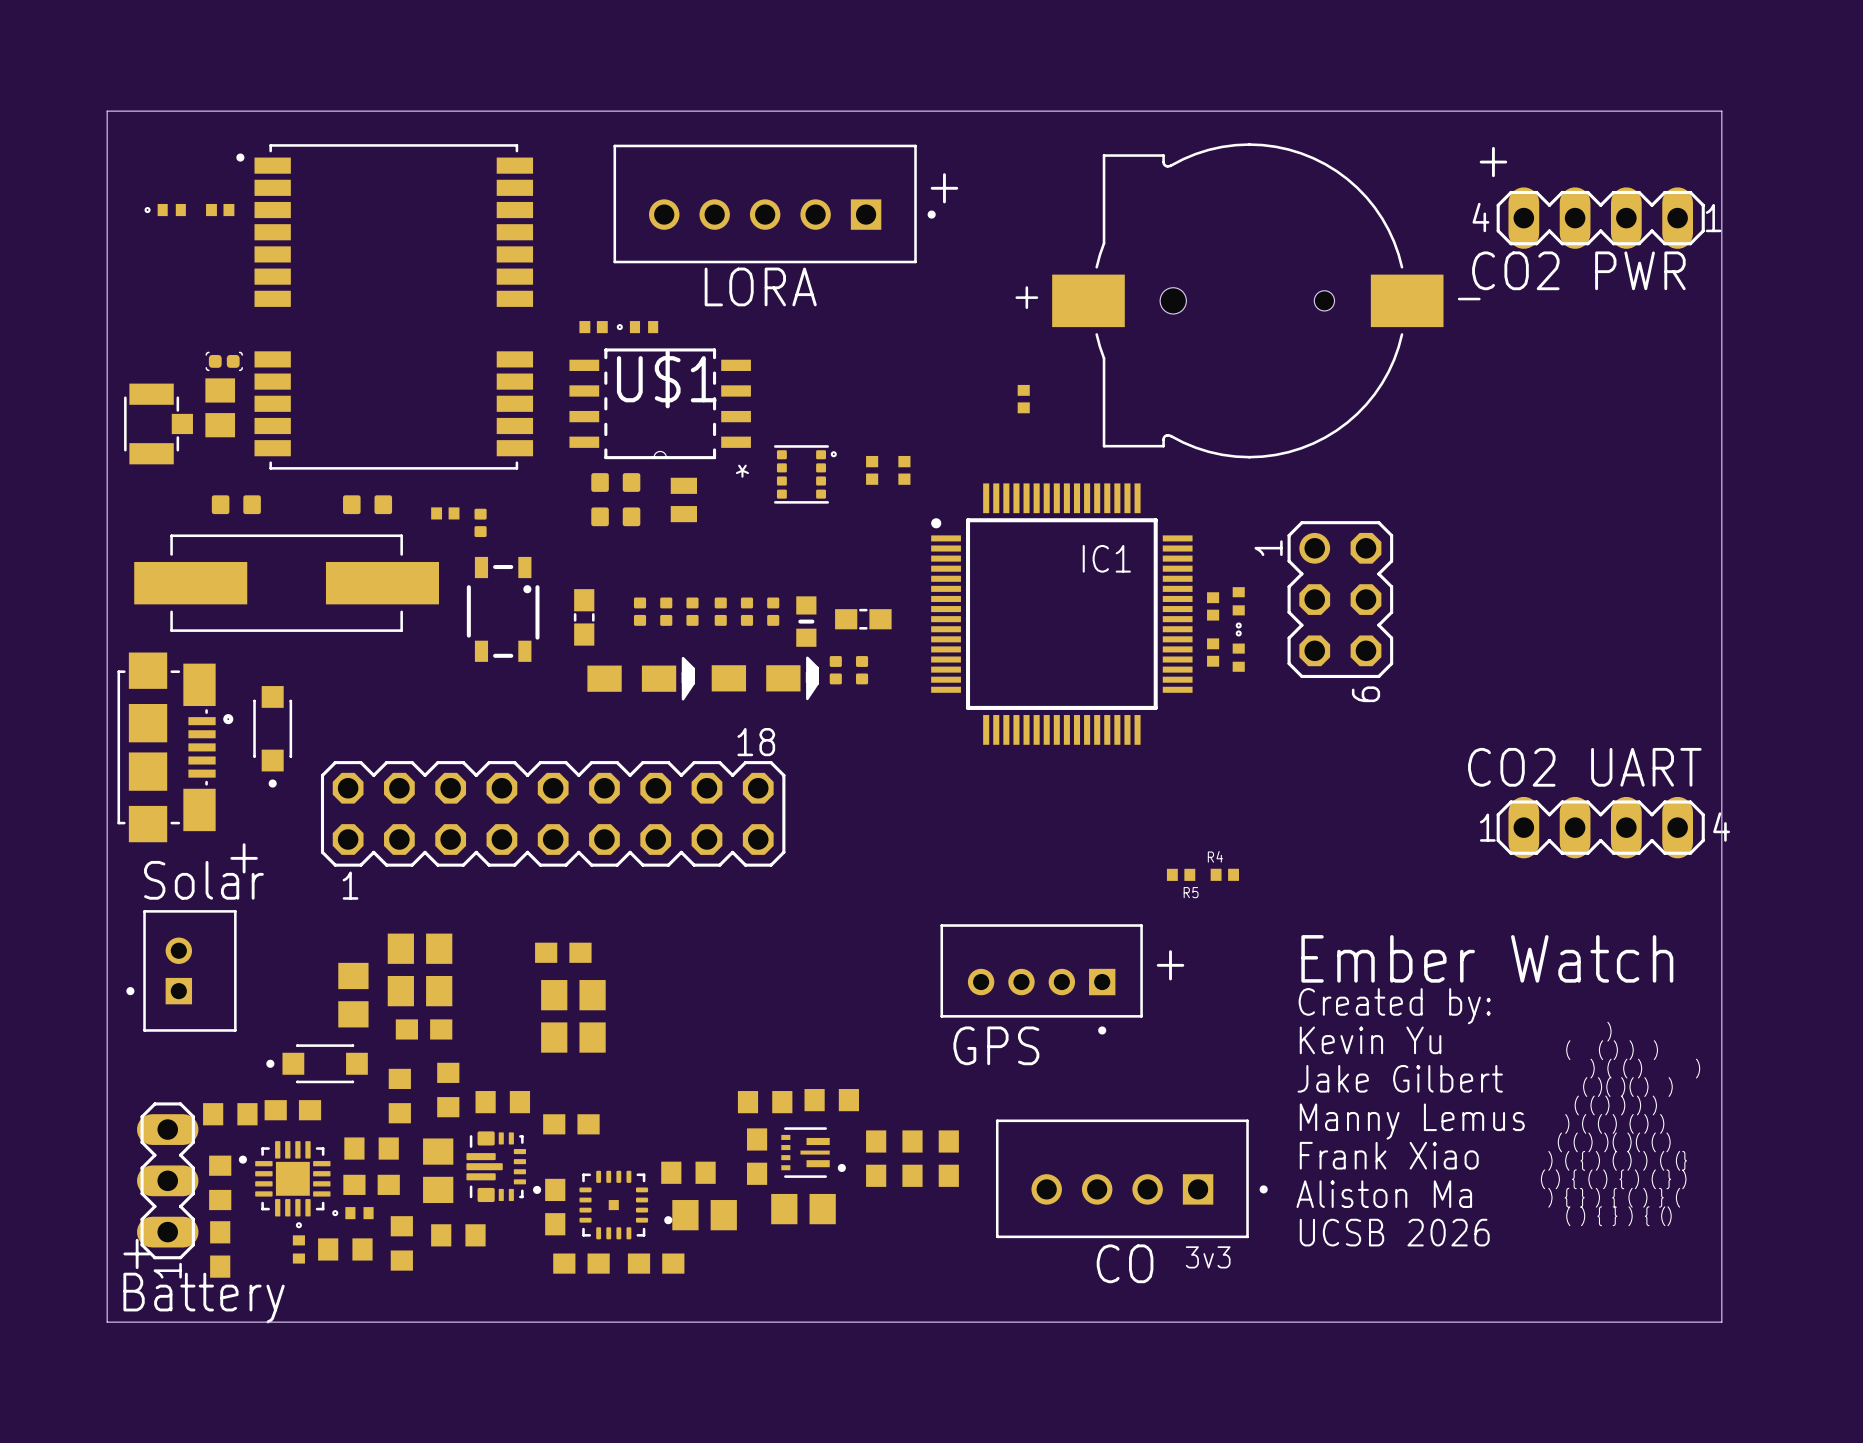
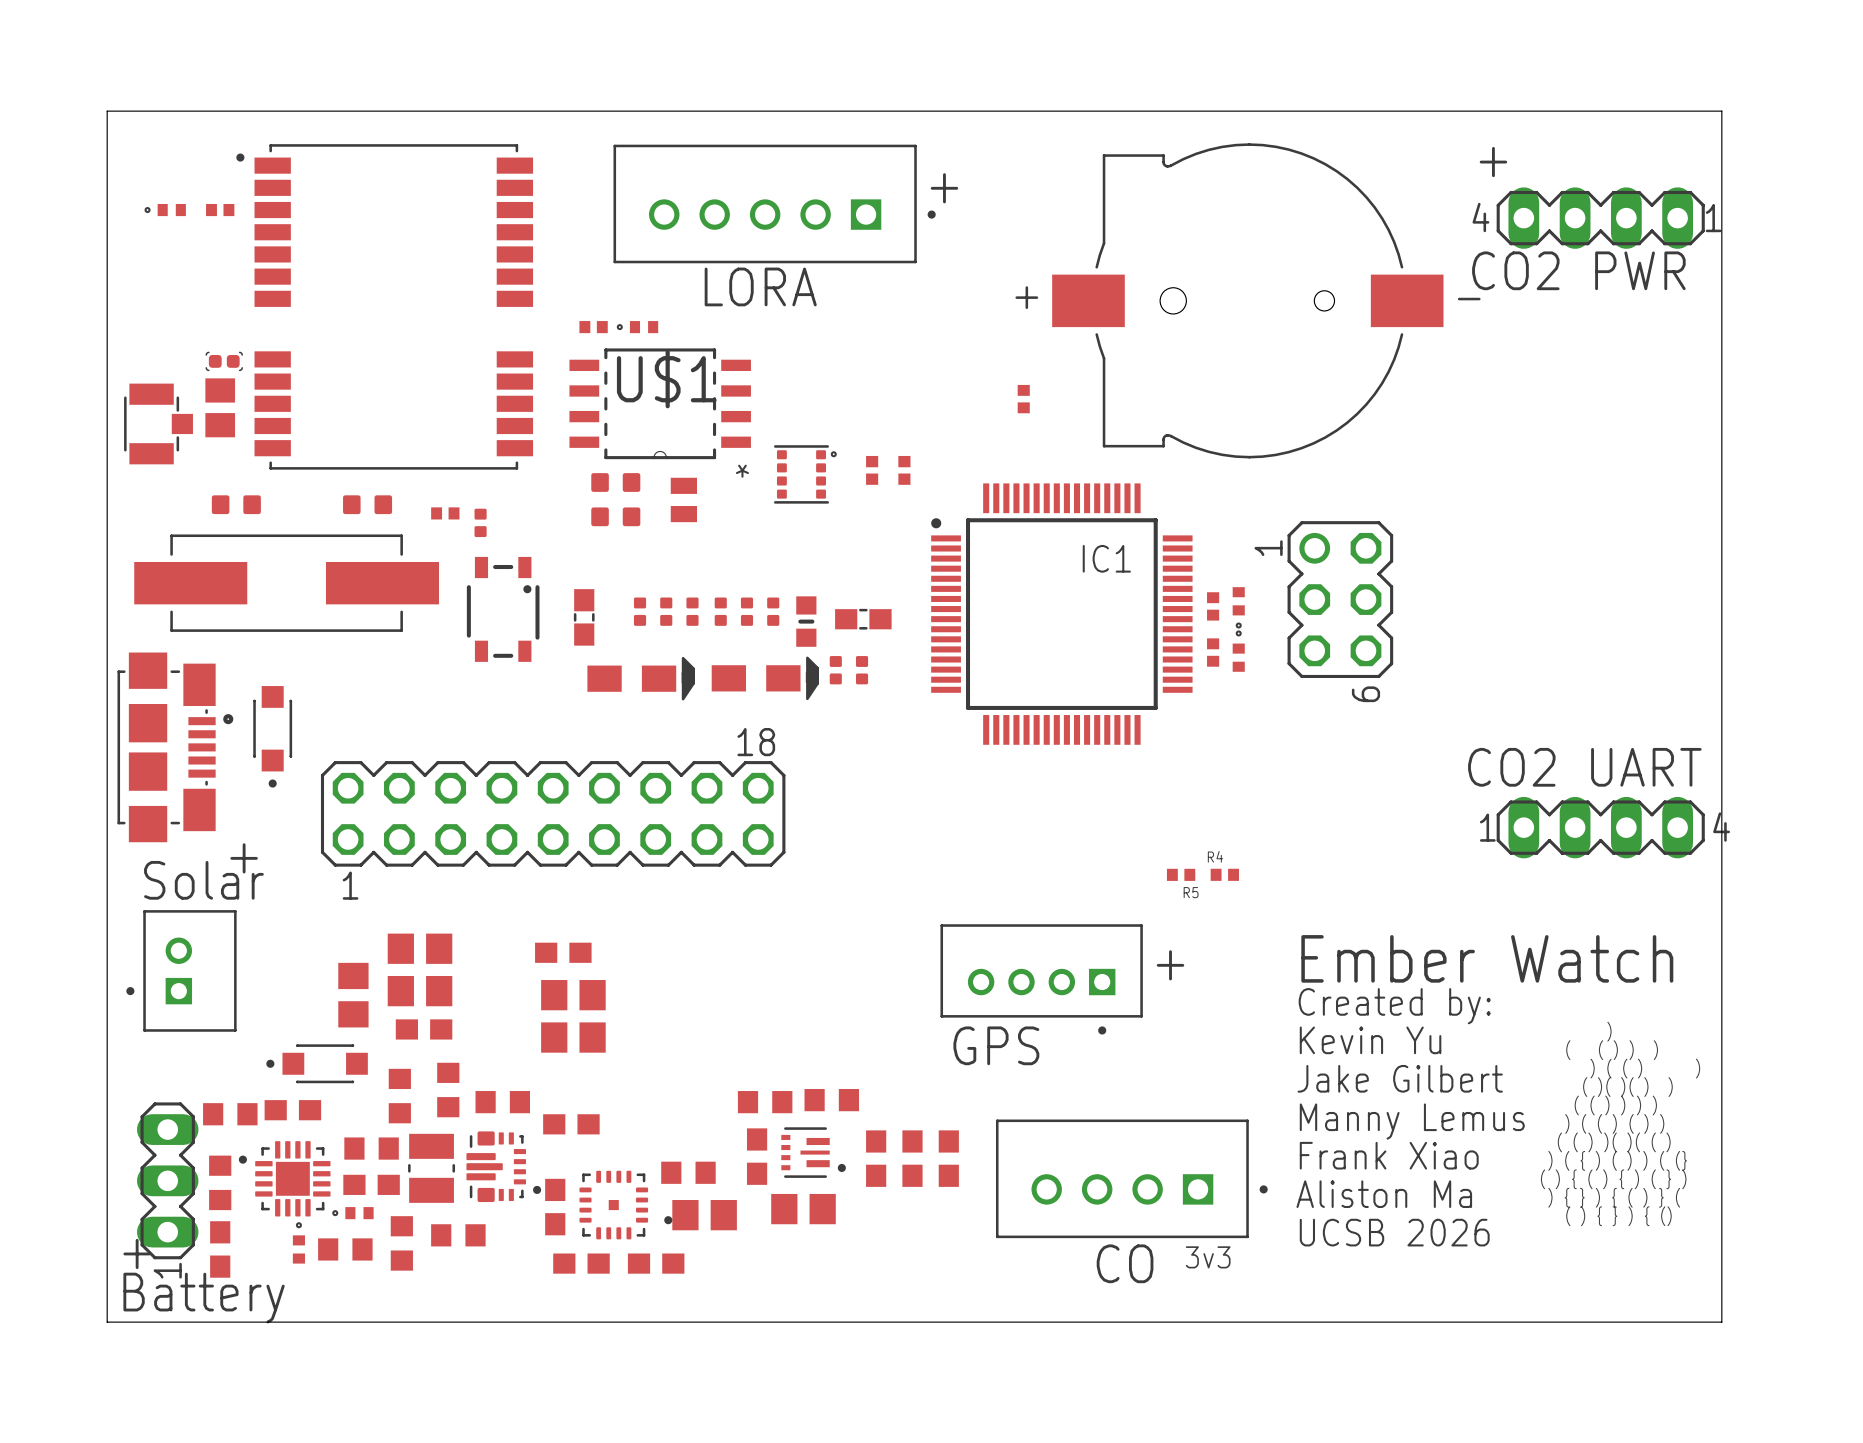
part footprint: [423, 1138, 454, 1204] -> [408, 1133, 456, 1203]

